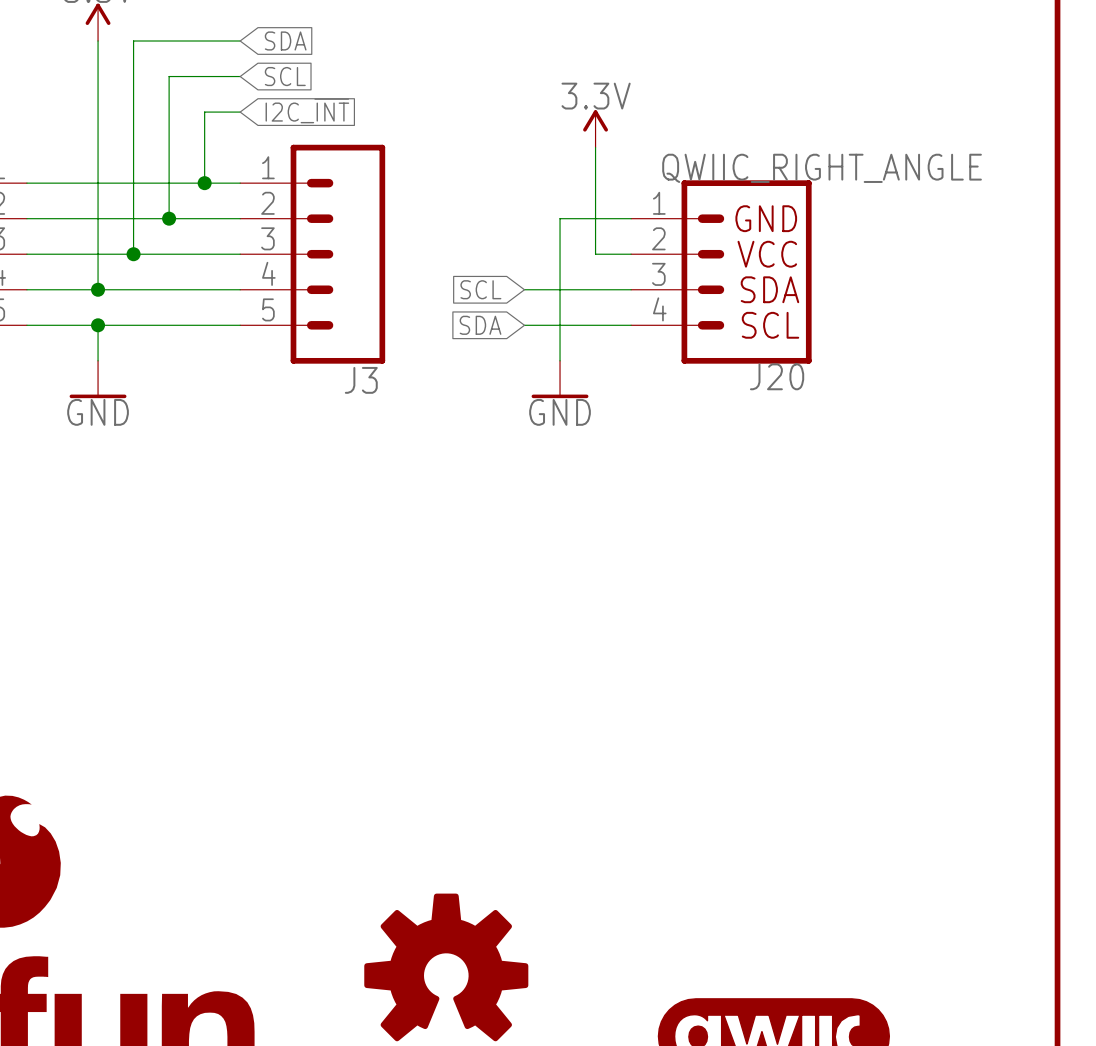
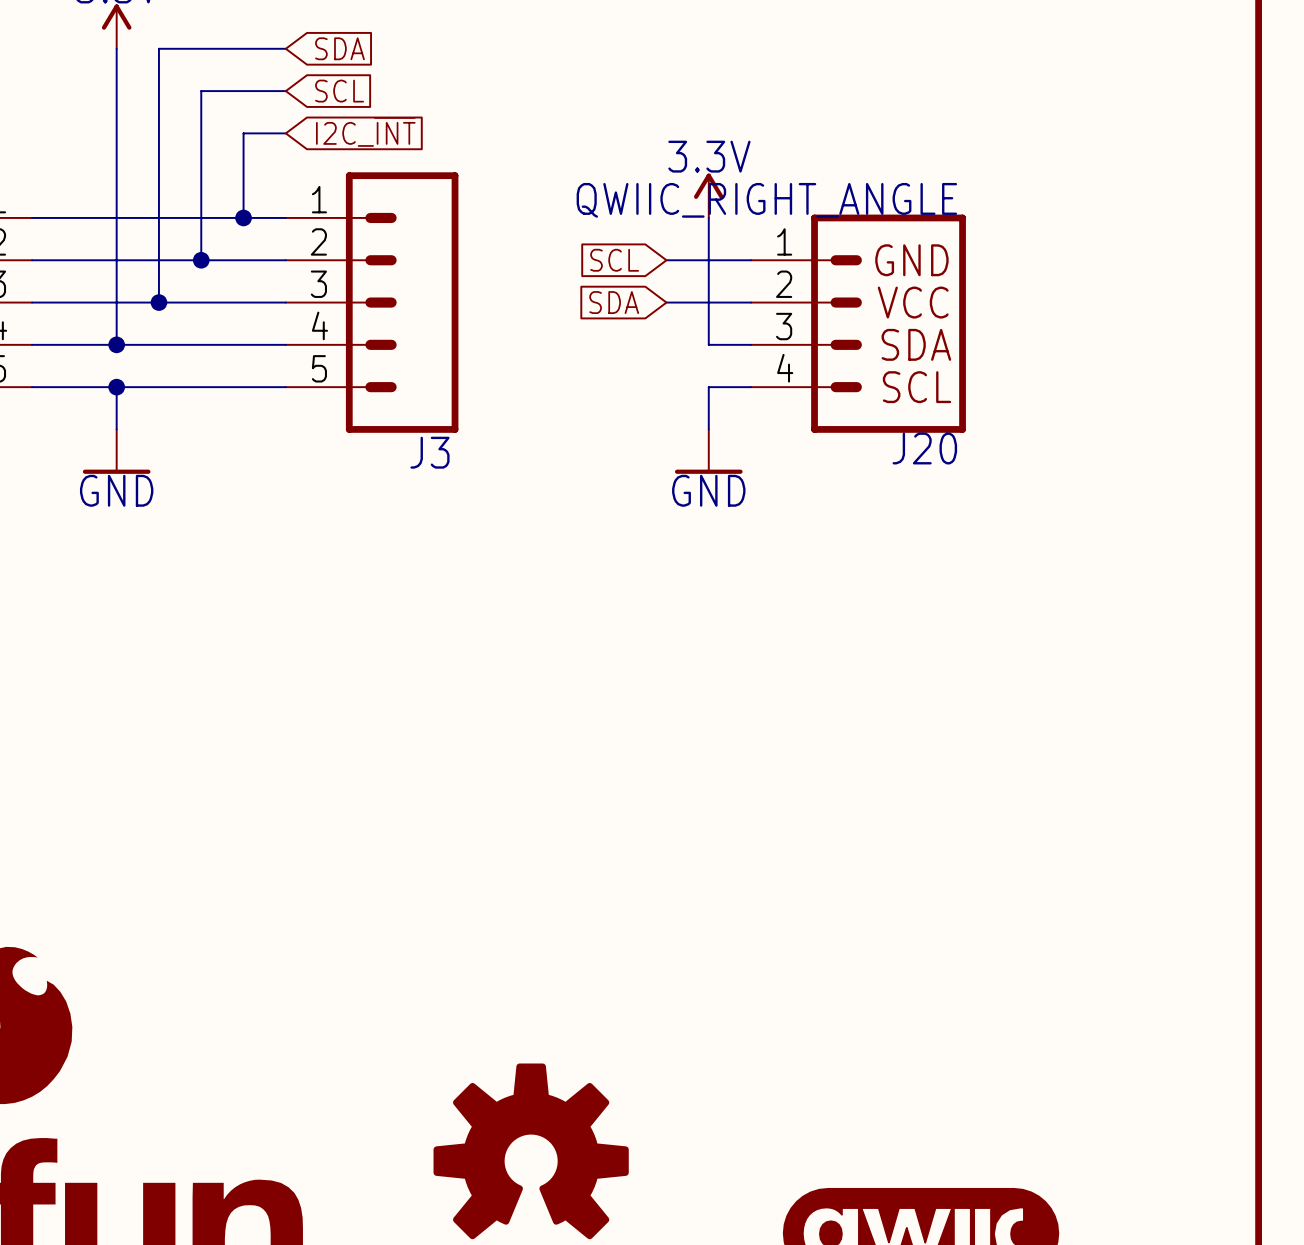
power symbol position: 3.3V (595, 128) -> 3.3V (708, 195)
J20 value position: QWIIC_RIGHT_ANGLE (822, 168) -> QWIIC_RIGHT_ANGLE (766, 200)
wire: (560, 218) (560, 360) -> none
global label position: SCL (480, 289) -> SCL (614, 260)
wire: (524, 289) (595, 289) -> (666, 302) (708, 302) (708, 344)
global label position: SDA (480, 325) -> SDA (614, 302)
wire: (524, 325) (595, 325) -> (708, 429) (708, 387)
power symbol position: GND (560, 379) -> GND (708, 451)

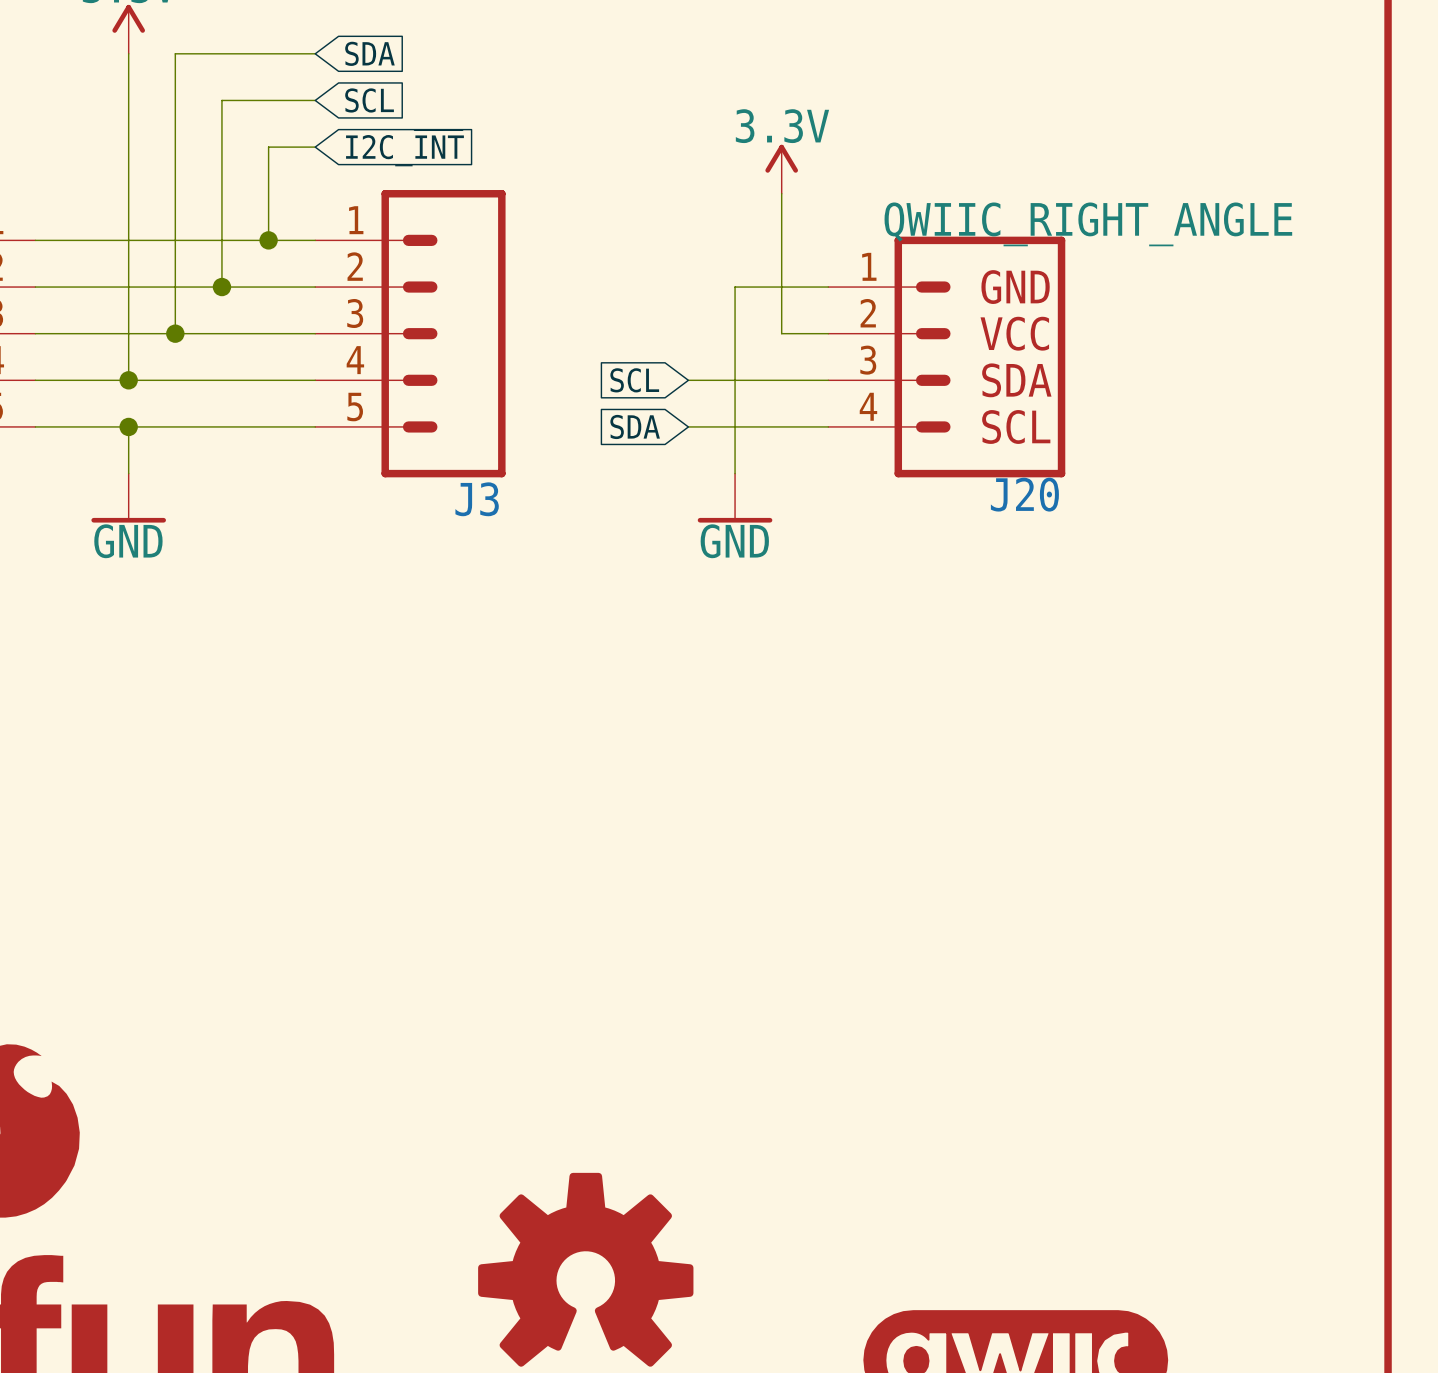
power symbol position: 3.3V (708, 195) -> 3.3V (781, 169)
J20 value position: QWIIC_RIGHT_ANGLE (766, 200) -> QWIIC_RIGHT_ANGLE (1088, 224)
global label position: SCL (614, 260) -> SCL (634, 380)
wire: none -> (735, 287) (735, 473)
global label position: SDA (614, 302) -> SDA (635, 426)
wire: (666, 302) (708, 302) (708, 344) -> (688, 380) (781, 380)
wire: (708, 387) (708, 429) -> (781, 426) (688, 426)
power symbol position: GND (708, 451) -> GND (735, 498)

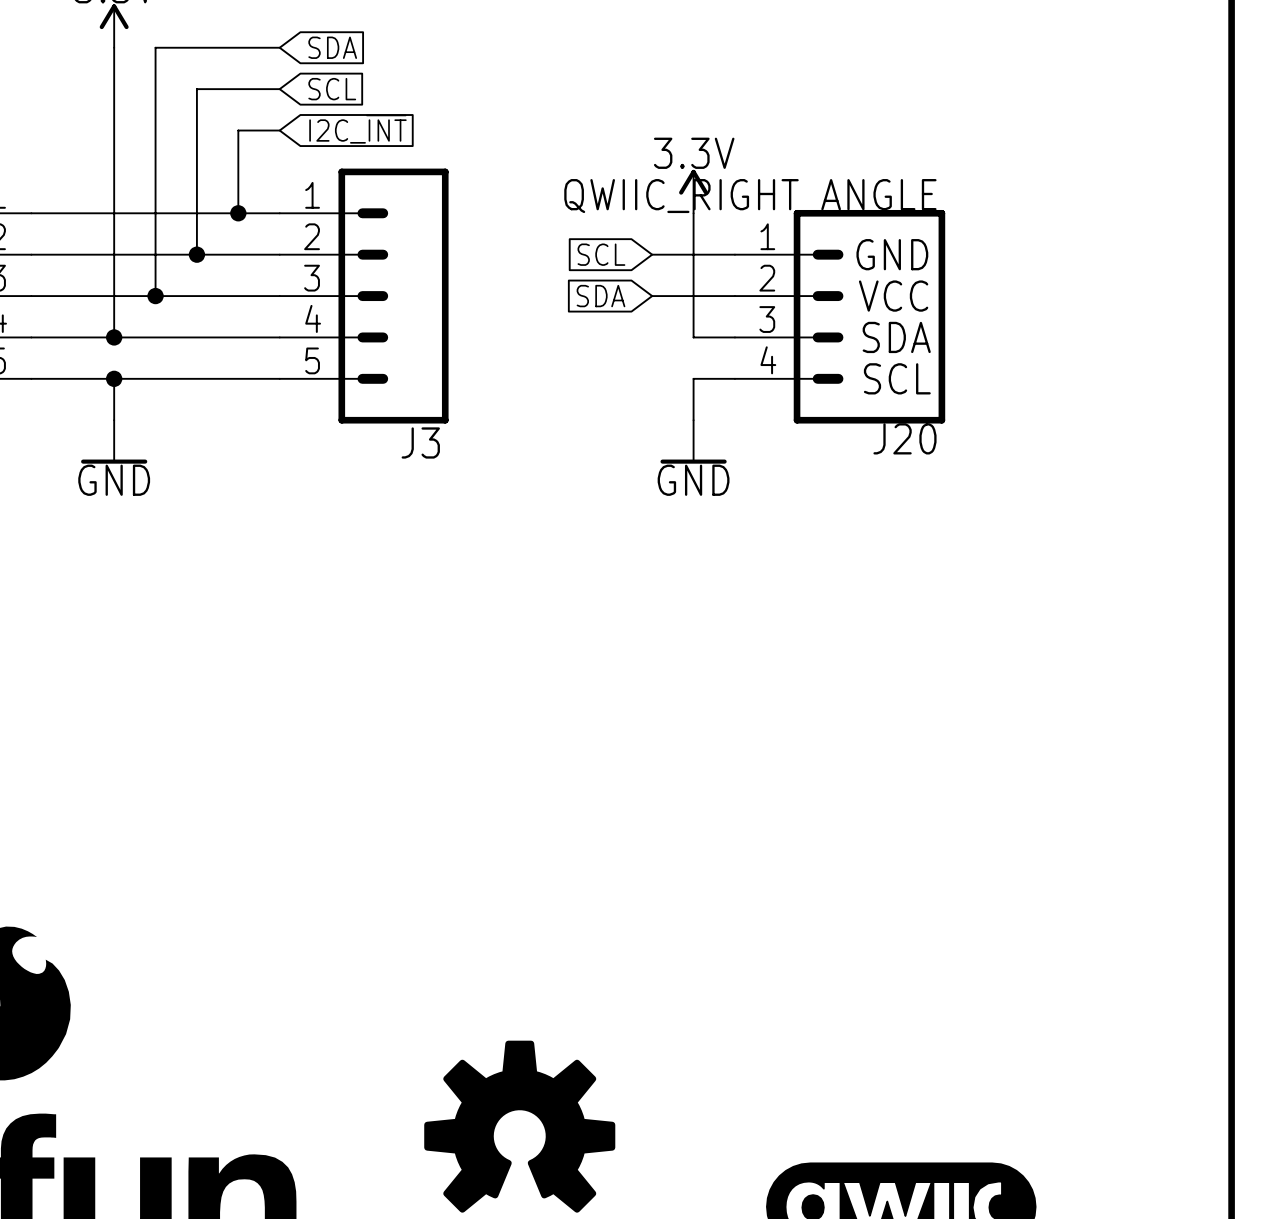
power symbol position: 3.3V (781, 169) -> 3.3V (693, 191)
J20 value position: QWIIC_RIGHT_ANGLE (1088, 224) -> QWIIC_RIGHT_ANGLE (750, 196)
wire: (735, 287) (735, 473) -> none
global label position: SCL (634, 380) -> SCL (601, 254)
wire: (688, 380) (781, 380) -> (652, 296) (693, 296) (693, 337)
global label position: SDA (635, 426) -> SDA (600, 296)
wire: (688, 426) (781, 426) -> (693, 420) (693, 378)
power symbol position: GND (735, 498) -> GND (693, 441)

